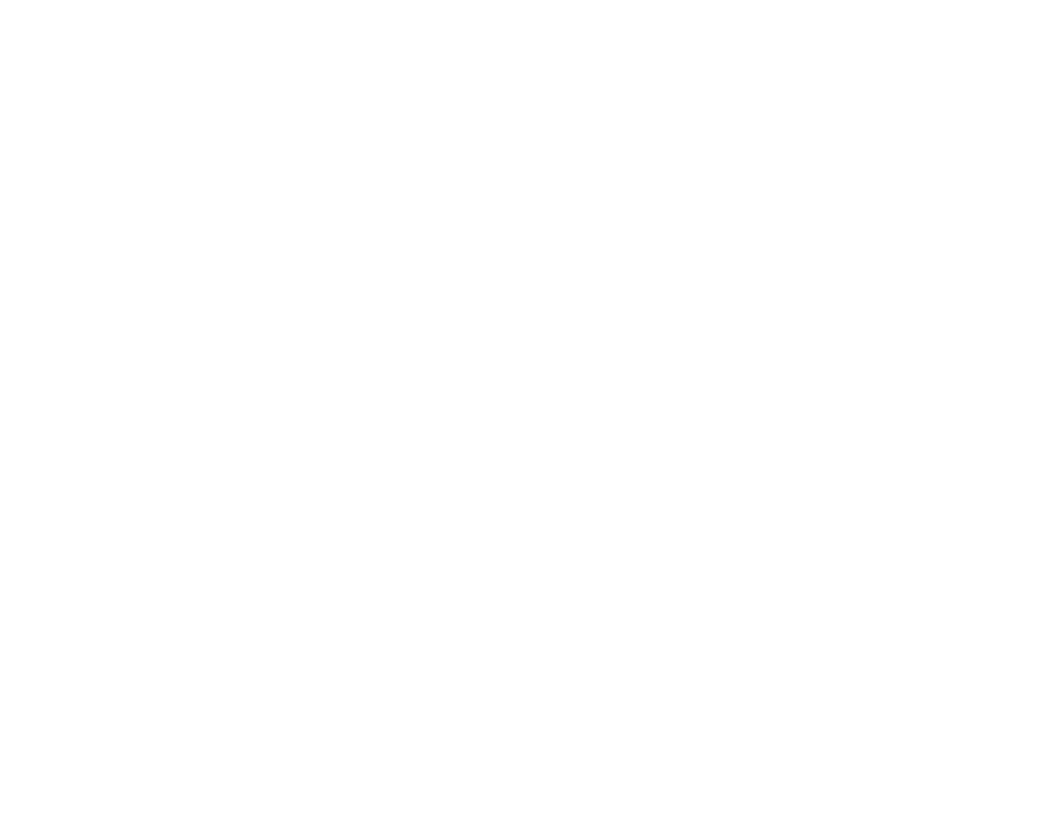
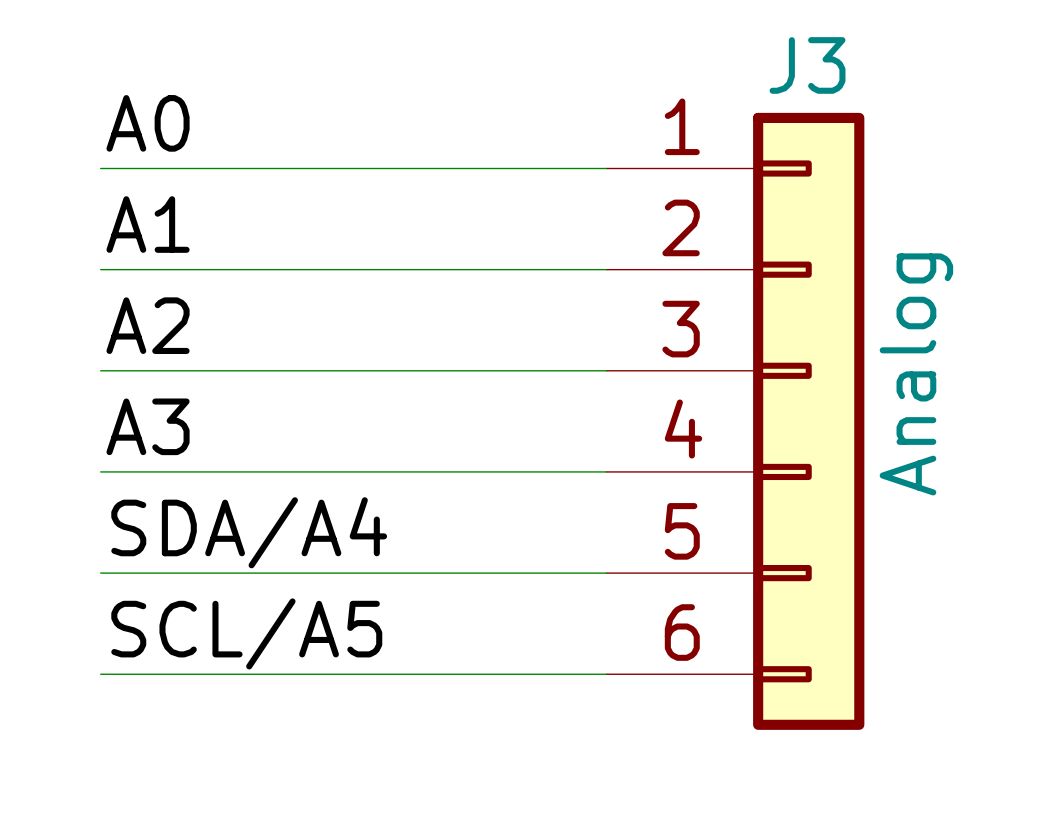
label: none -> A0 (148, 123)
wire: none -> (100, 168) (606, 168)
label: none -> A1 (148, 224)
wire: none -> (100, 269) (606, 269)
label: none -> A2 (148, 325)
wire: none -> (100, 370) (606, 370)
J3: none -> Analog (735, 421)
label: none -> A3 (148, 426)
wire: none -> (100, 471) (606, 471)
label: none -> SDA/A4 (249, 532)
wire: none -> (100, 573) (606, 573)
label: none -> SCL/A5 (246, 633)
wire: none -> (100, 674) (606, 674)

